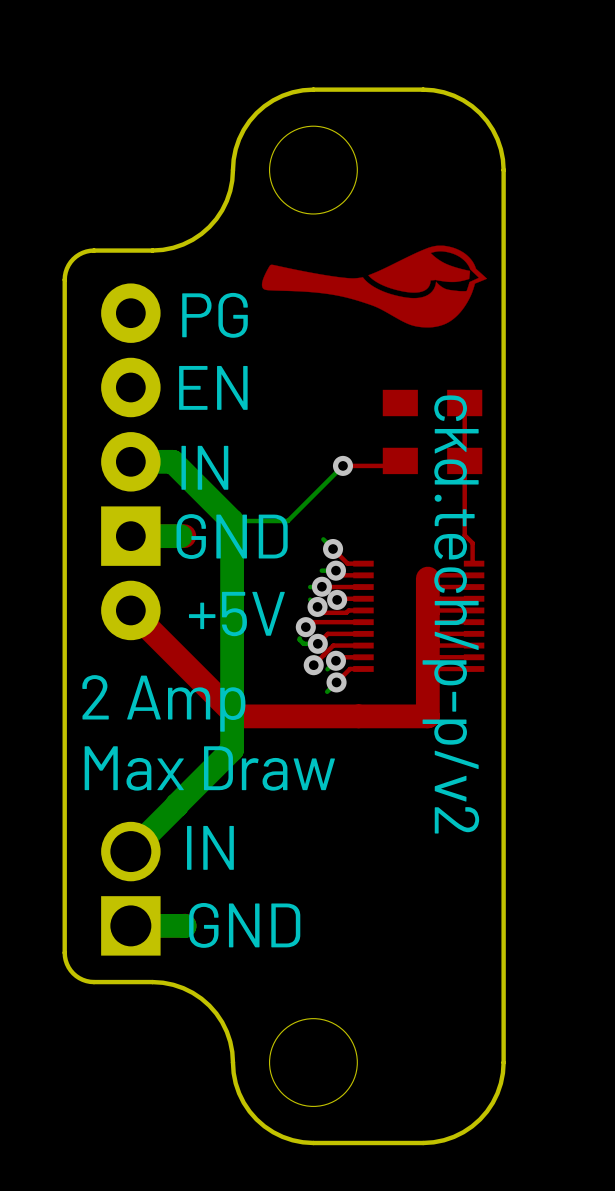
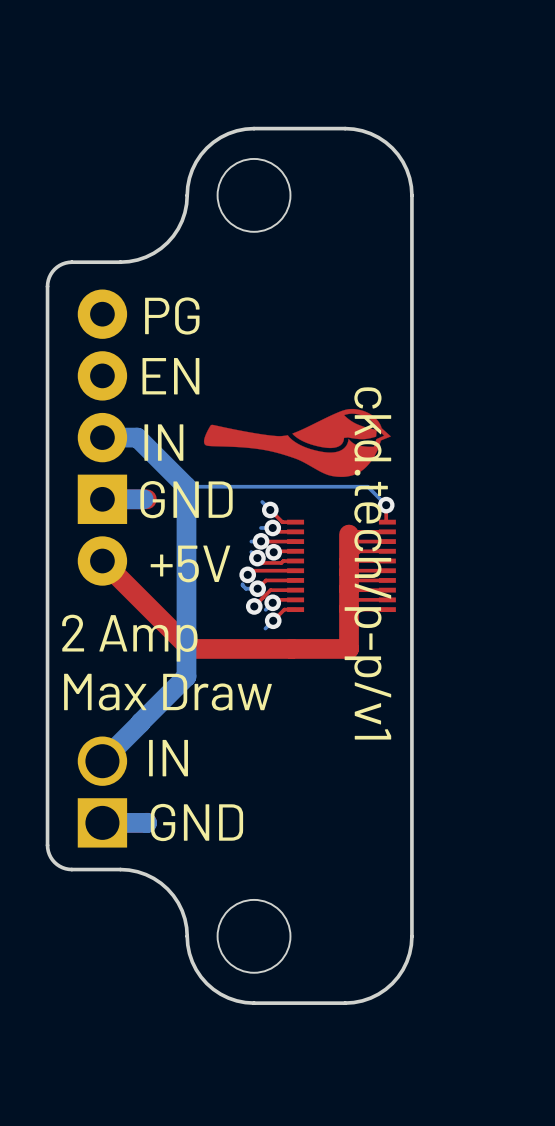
drawing position: (374, 286) -> (297, 442)
part: (432, 403) -> none
top track: (464, 403) (464, 535) (472, 543) -> none
top track: (400, 460) (395, 465) (342, 465) -> none
part: (432, 460) -> none
bottom track: (342, 465) (287, 521) -> (386, 505) (367, 486) (232, 486)
via position: (342, 465) -> (386, 505)
text: ckd.tech/p-p/v2 (450, 614) -> ckd.tech/p-p/v1 (367, 563)

